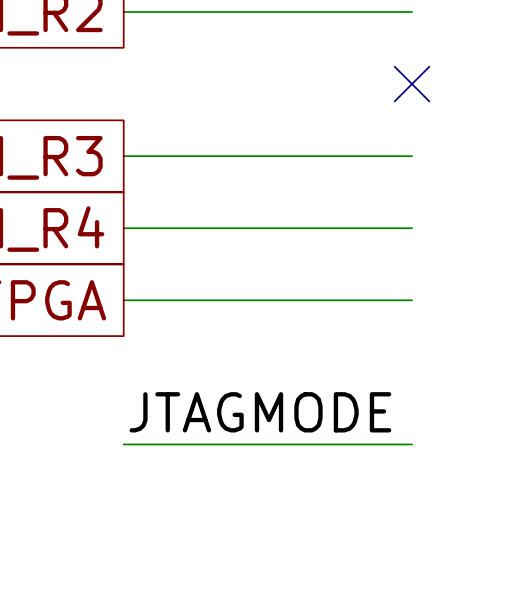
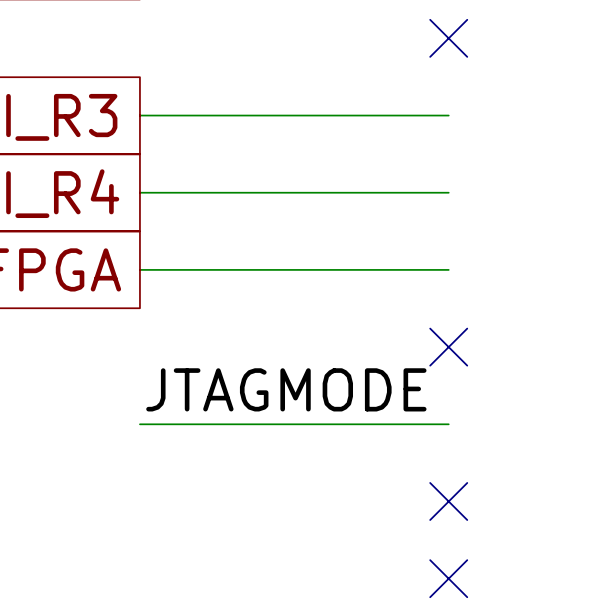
no-connect mark: none -> (448, 347)
no-connect mark: none -> (448, 501)
no-connect mark: none -> (448, 578)

